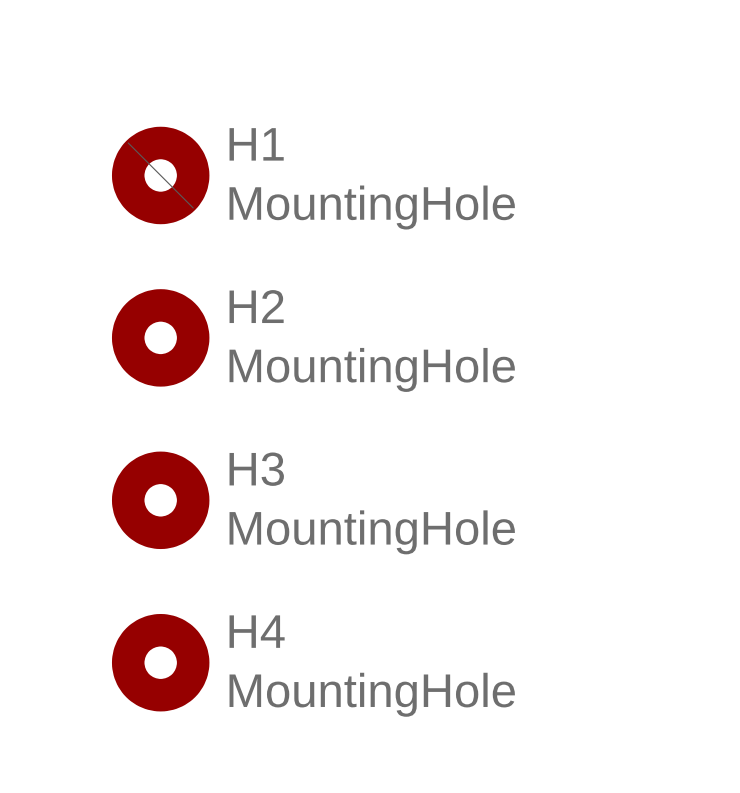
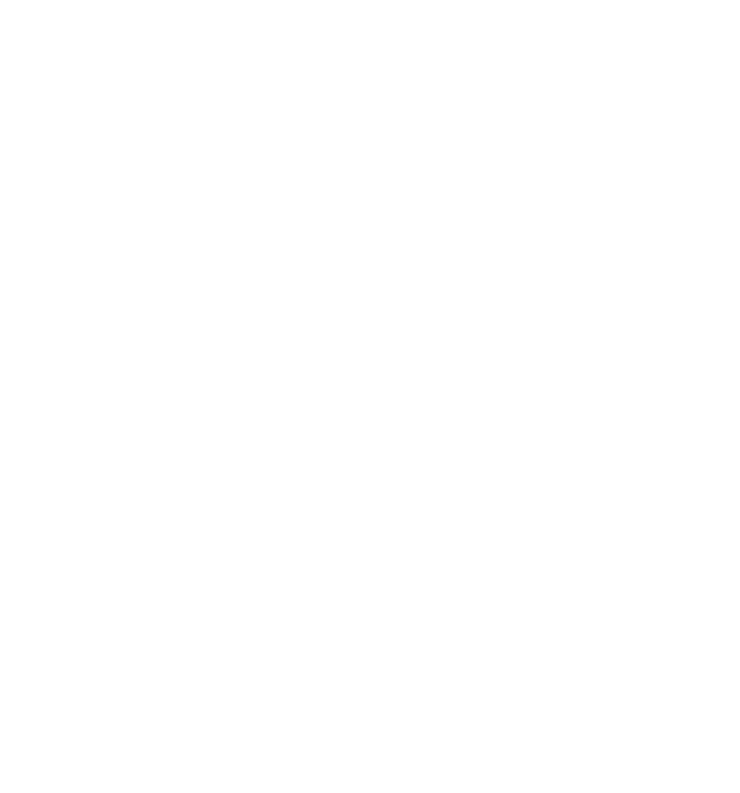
bus: (128, 142) (193, 207) -> none
H1: MountingHole (160, 175) -> none
H2: MountingHole (160, 337) -> none
H3: MountingHole (160, 500) -> none
H4: MountingHole (160, 662) -> none

